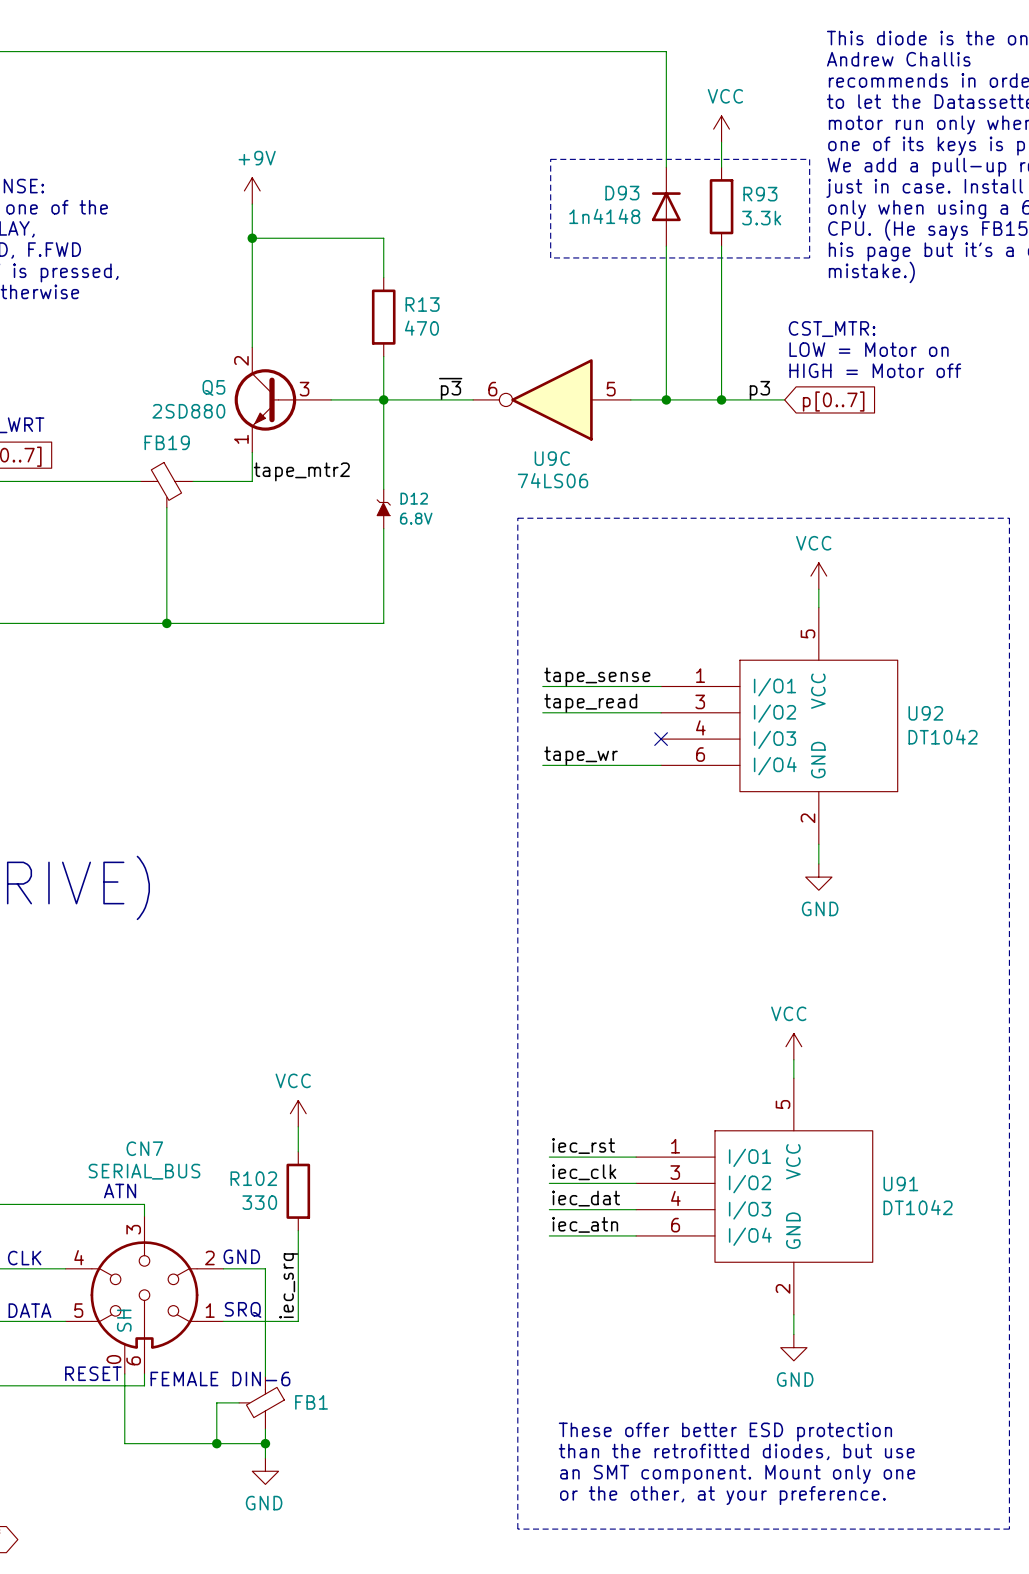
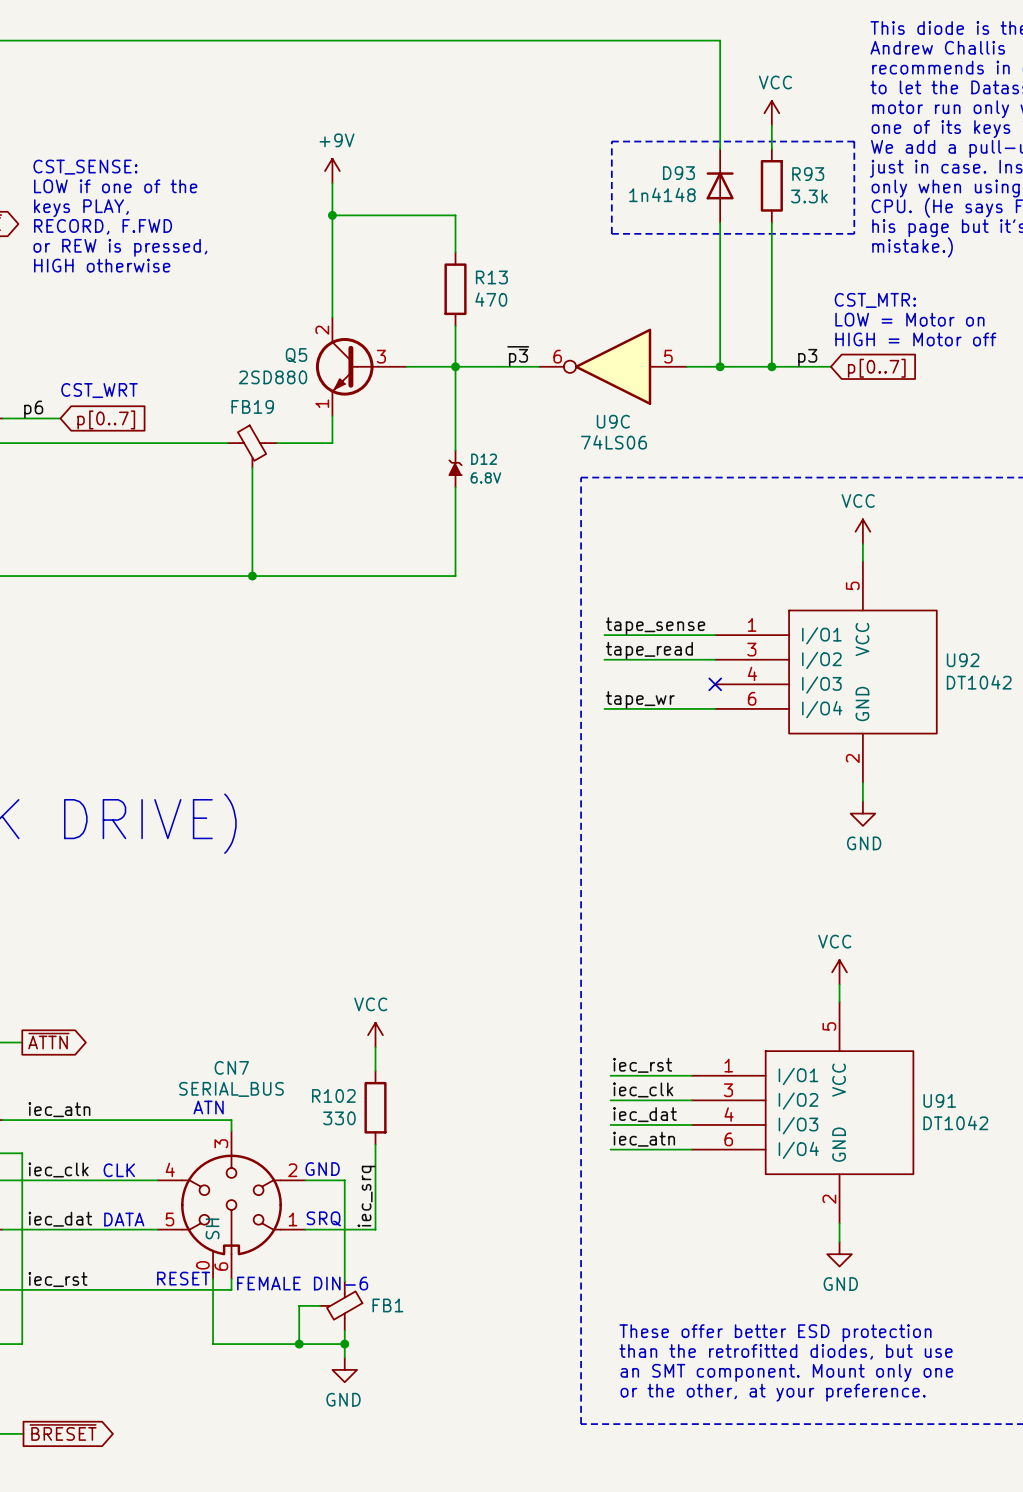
label: tape_mtr2 (301, 471) -> none

